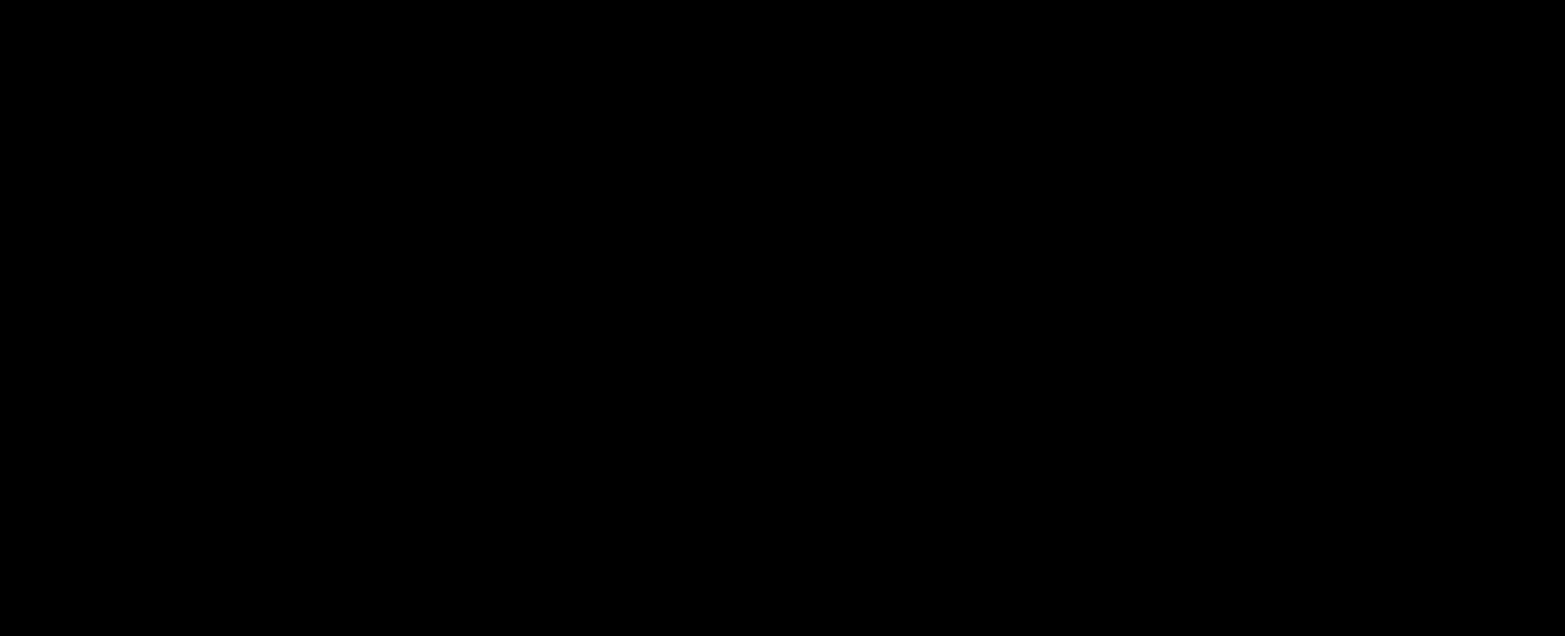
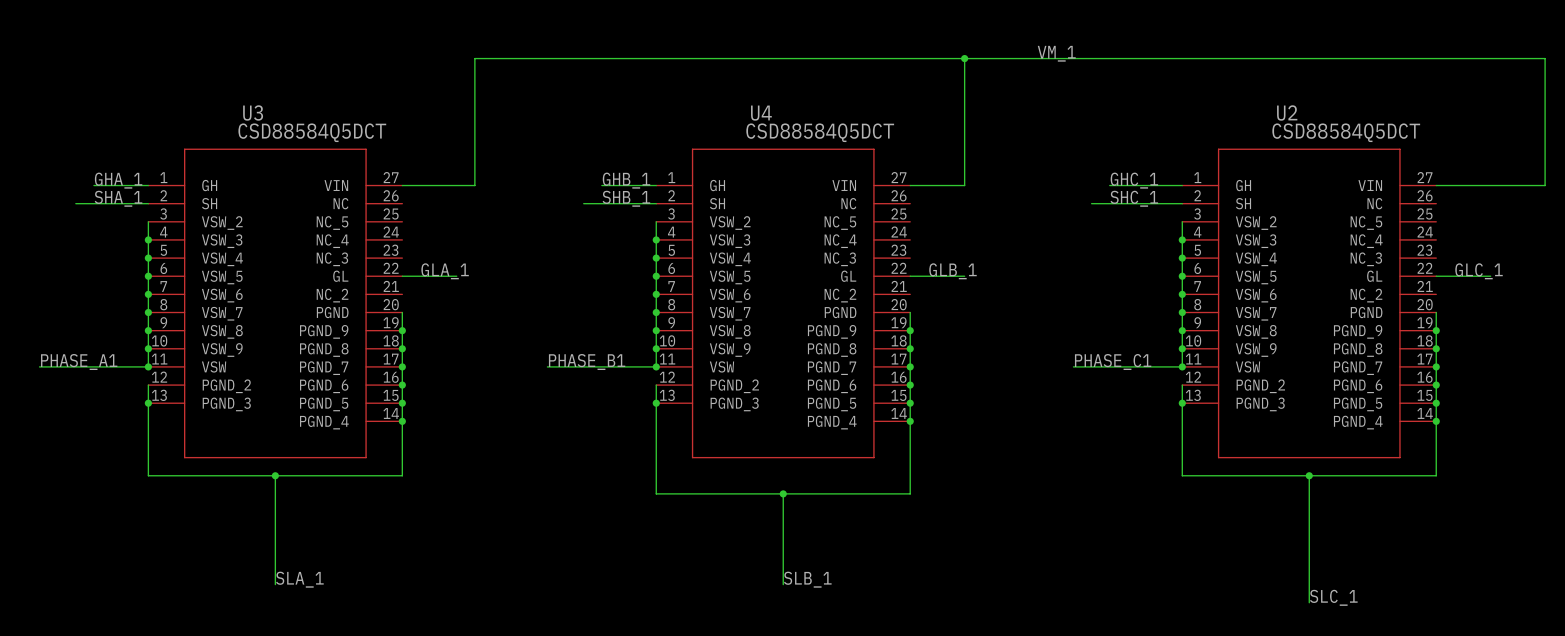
label: none -> VM_1 (1056, 53)
wire: none -> (964, 58) (964, 185) (910, 185)
junction: none -> (964, 58)
label: none -> GHA_1 (118, 180)
label: none -> GHB_1 (626, 180)
label: none -> GHC_1 (1134, 180)
wire: none -> (93, 185) (148, 185)
wire: none -> (402, 185) (474, 185) (474, 58) (1545, 58) (1545, 185) (1436, 185)
wire: none -> (601, 185) (656, 185)
wire: none -> (1109, 185) (1182, 185)
label: none -> SHA_1 (118, 198)
label: none -> SHB_1 (626, 198)
label: none -> SHC_1 (1134, 198)
wire: none -> (75, 203) (148, 203)
wire: none -> (583, 203) (656, 203)
wire: none -> (1091, 203) (1182, 203)
wire: none -> (148, 221) (148, 366) (39, 366)
wire: none -> (656, 221) (656, 366) (547, 366)
wire: none -> (1182, 221) (1182, 366) (1073, 366)
junction: none -> (148, 239)
junction: none -> (656, 239)
junction: none -> (1182, 239)
junction: none -> (148, 258)
junction: none -> (656, 258)
junction: none -> (1182, 258)
label: none -> GLA_1 (445, 271)
label: none -> GLB_1 (952, 271)
label: none -> GLC_1 (1479, 271)
junction: none -> (148, 276)
wire: none -> (402, 276) (456, 276)
junction: none -> (656, 276)
wire: none -> (910, 276) (964, 276)
junction: none -> (1182, 276)
wire: none -> (1436, 276) (1490, 276)
junction: none -> (148, 294)
junction: none -> (656, 294)
junction: none -> (1182, 294)
U3: none -> CSD88584Q5DCT (275, 303)
U4: none -> CSD88584Q5DCT (783, 303)
U2: none -> CSD88584Q5DCT (1309, 303)
junction: none -> (148, 312)
wire: none -> (402, 312) (402, 475) (148, 475) (148, 385)
junction: none -> (656, 312)
wire: none -> (910, 312) (910, 493) (656, 493) (656, 385)
junction: none -> (1182, 312)
wire: none -> (1436, 312) (1436, 475) (1182, 475) (1182, 385)
junction: none -> (148, 330)
junction: none -> (402, 330)
junction: none -> (656, 330)
junction: none -> (910, 330)
junction: none -> (1182, 330)
junction: none -> (1436, 330)
junction: none -> (148, 348)
junction: none -> (402, 348)
junction: none -> (656, 348)
junction: none -> (910, 348)
junction: none -> (1182, 348)
junction: none -> (1436, 348)
label: none -> PHASE_A1 (79, 362)
label: none -> PHASE_B1 (587, 362)
label: none -> PHASE_C1 (1113, 362)
junction: none -> (148, 366)
junction: none -> (402, 366)
junction: none -> (656, 366)
junction: none -> (910, 366)
junction: none -> (1182, 366)
junction: none -> (1436, 366)
junction: none -> (402, 385)
junction: none -> (910, 385)
junction: none -> (1436, 385)
junction: none -> (148, 403)
junction: none -> (402, 403)
junction: none -> (656, 403)
junction: none -> (910, 403)
junction: none -> (1182, 403)
junction: none -> (1436, 403)
junction: none -> (402, 421)
junction: none -> (910, 421)
junction: none -> (1436, 421)
wire: none -> (275, 475) (275, 584)
junction: none -> (275, 475)
wire: none -> (1309, 475) (1309, 602)
junction: none -> (1309, 475)
wire: none -> (783, 493) (783, 584)
junction: none -> (783, 493)
label: none -> SLA_1 (299, 579)
label: none -> SLB_1 (807, 579)
label: none -> SLC_1 (1333, 597)

